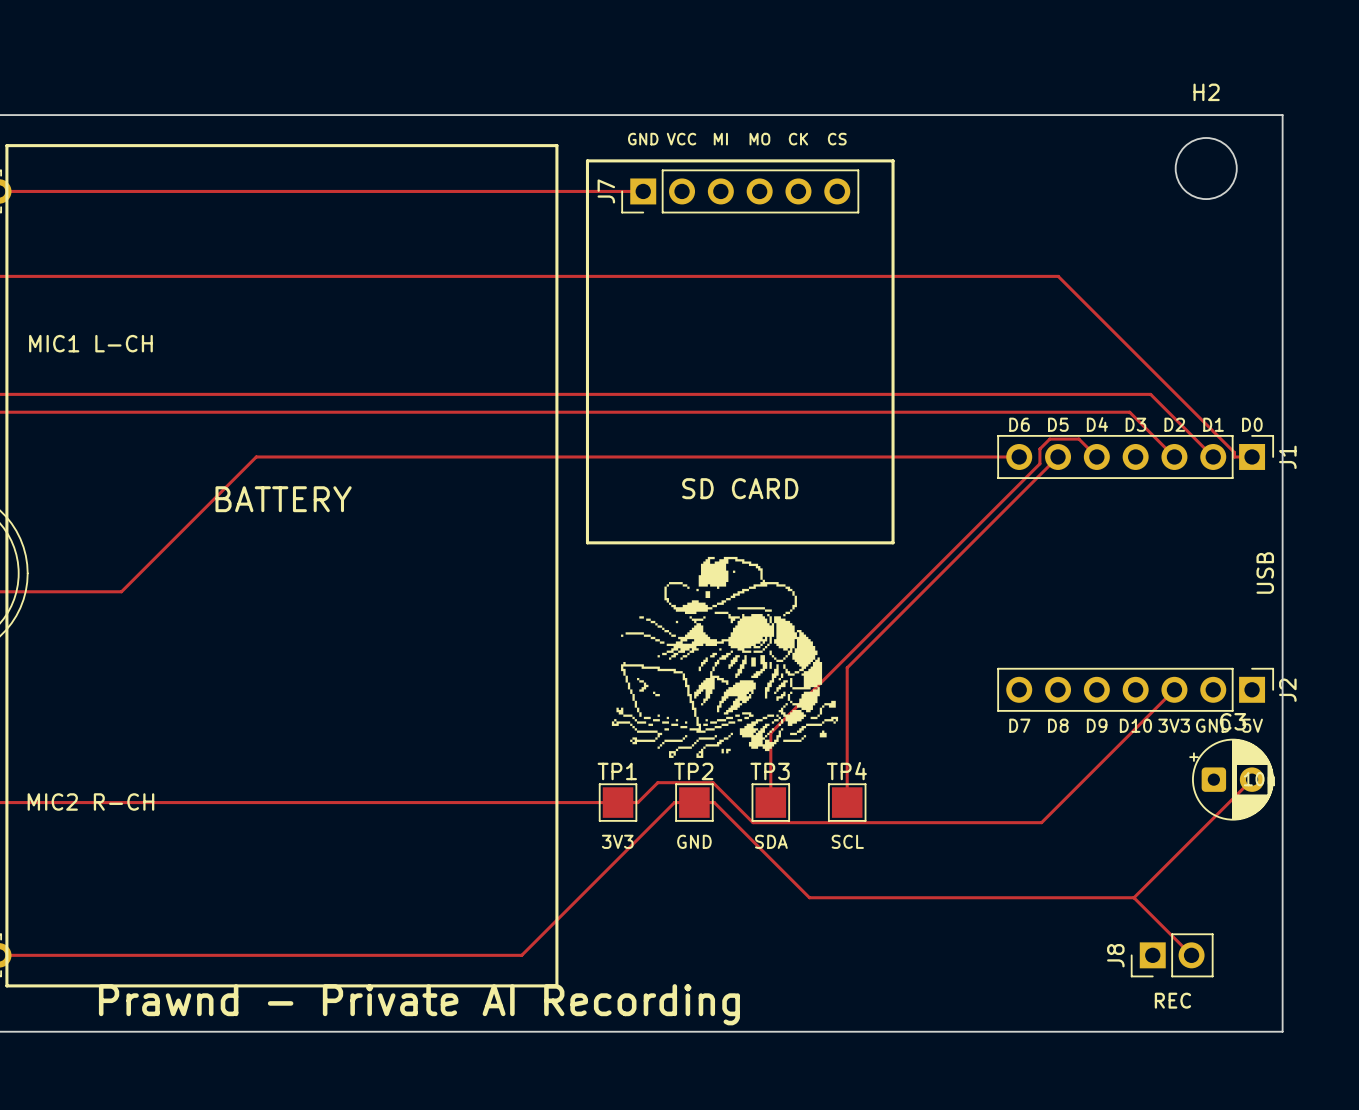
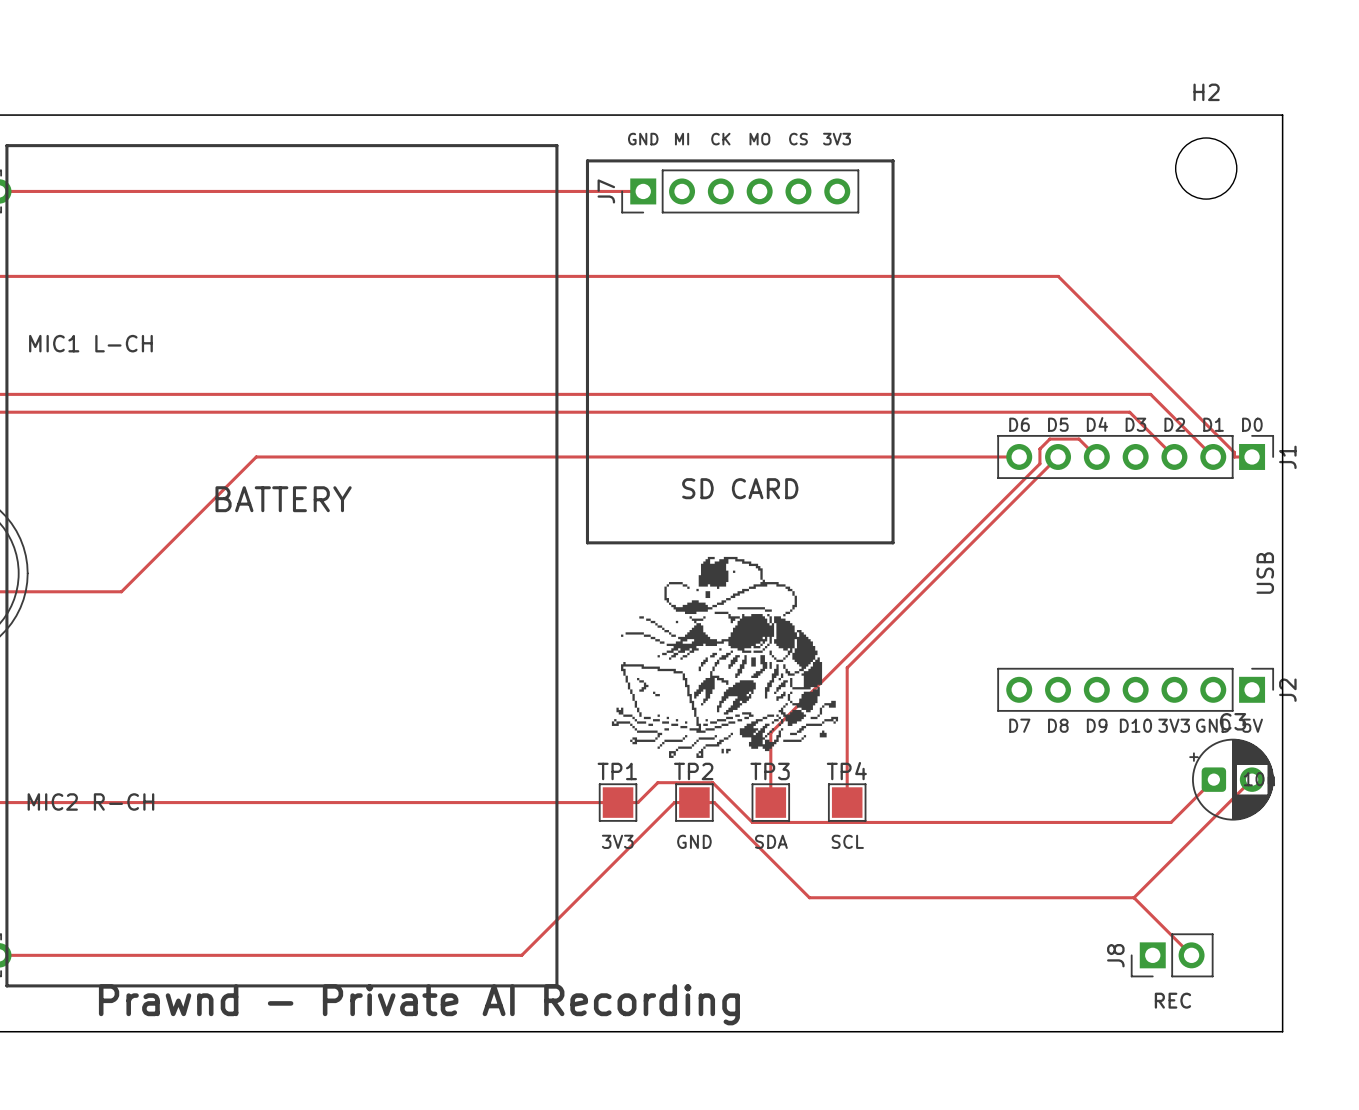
text: VCC (681, 139) -> MI (682, 139)
text: MI (720, 139) -> CK (720, 139)
text: CK (798, 139) -> CS (798, 139)
text: CS (837, 139) -> 3V3 (837, 139)
track: (1174, 689) (1041, 822) (753, 822) (712, 782) -> (1213, 779) (1171, 822) (752, 822) (712, 782)

